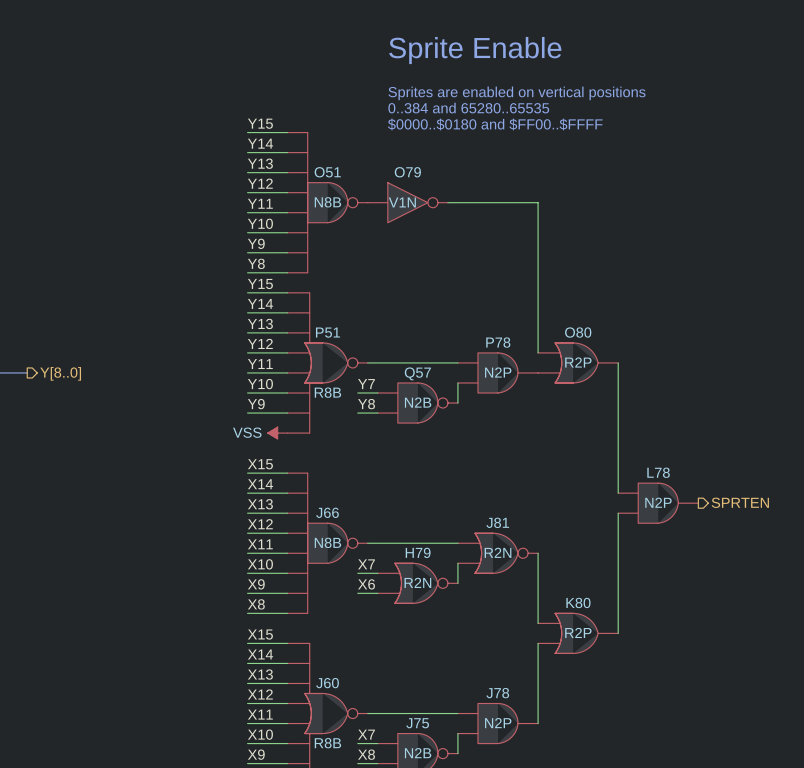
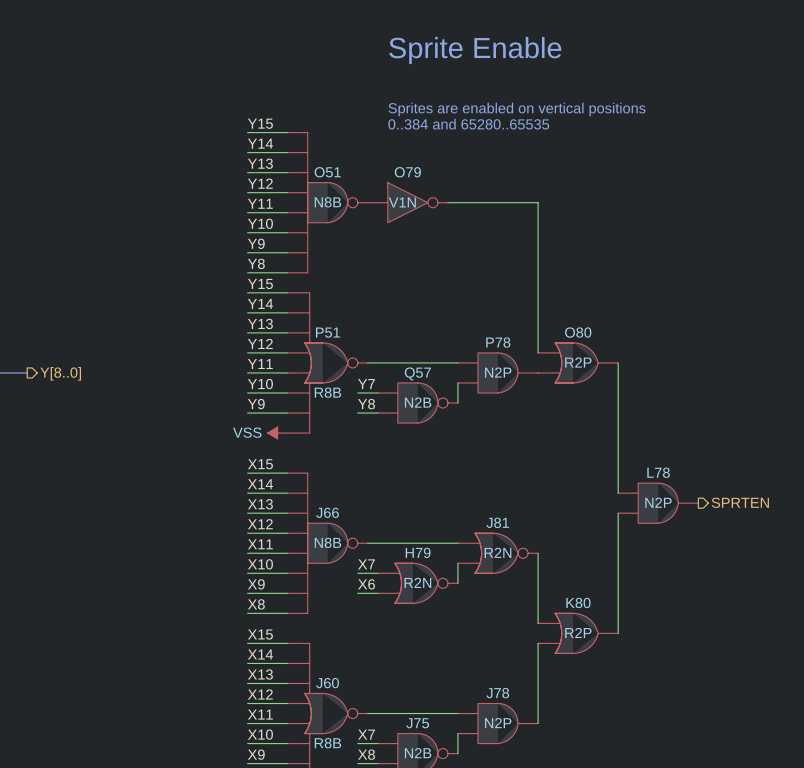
text: Sprites are enabled on vertical positions (516, 93) -> none
text: 0..384 and 65280..65535 (468, 108) -> Sprites are enabled on vertical positions (516, 109)
text: $0000..$0180 and $FF00..$FFFF (495, 124) -> 0..384 and 65280..65535 (468, 124)

